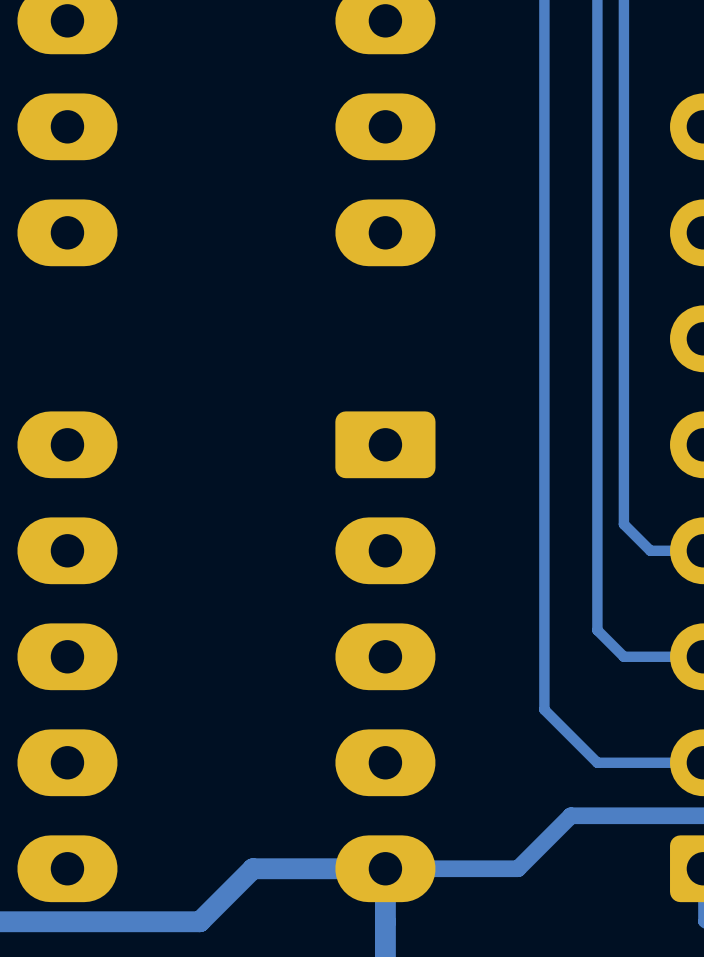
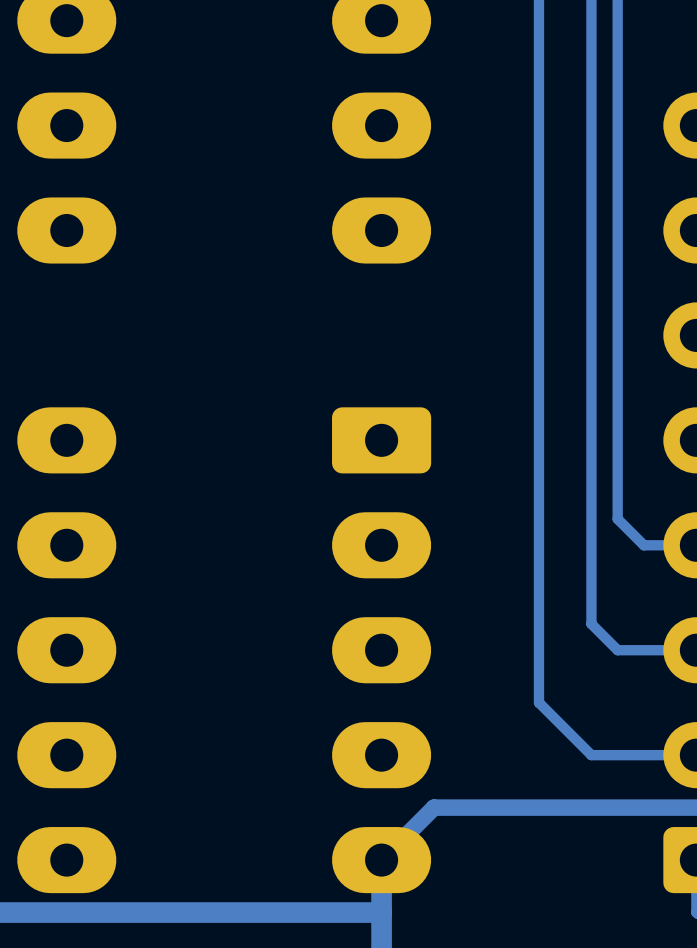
track: (570, 815) (517, 868) (252, 868) (199, 921) -> (565, 807) (434, 807) (381, 860)
track: none -> (381, 912) (197, 912)

